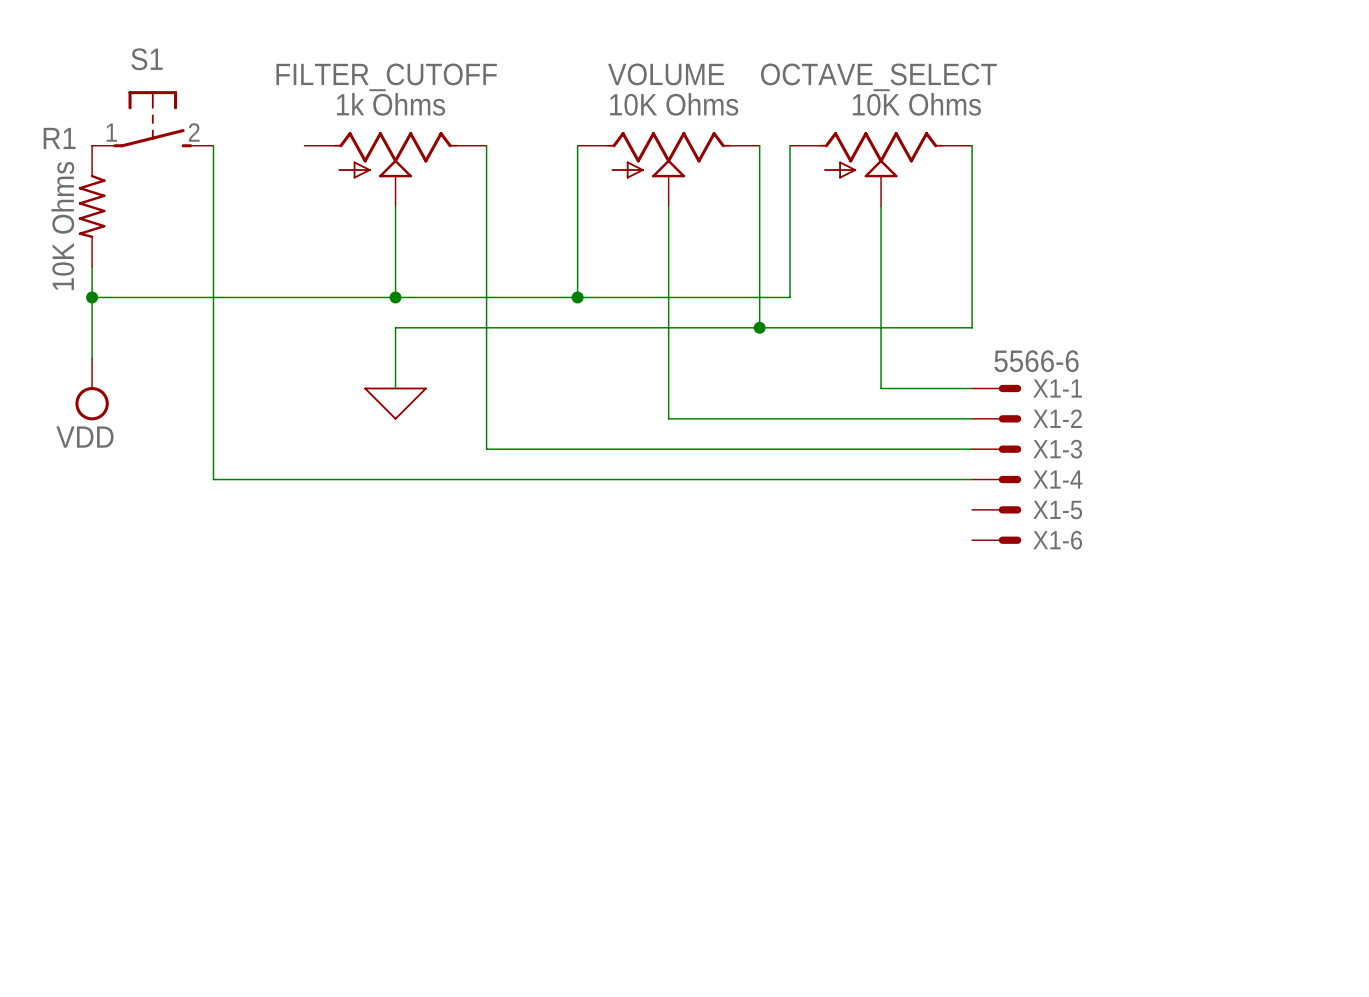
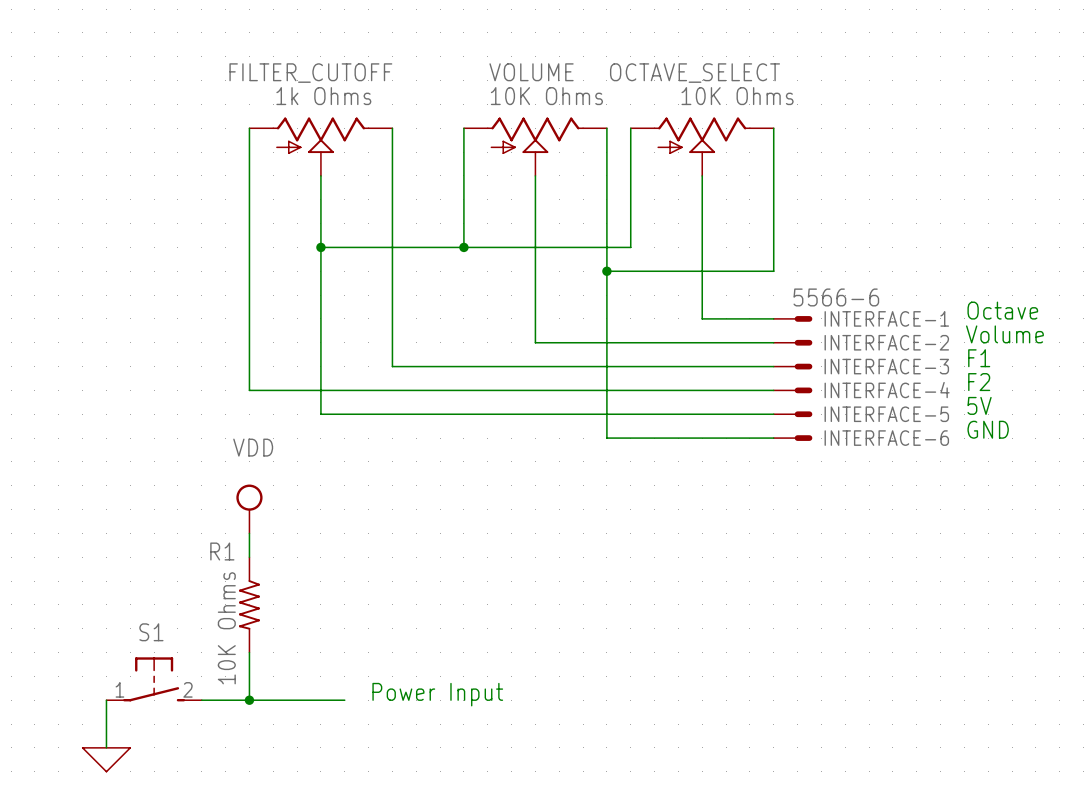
S1 position: (152, 119) -> (154, 679)
wire: (213, 145) (213, 479) (304, 479) -> (249, 128) (249, 390)
R1 position: (92, 206) -> (249, 604)
wire: (92, 267) (92, 358) -> none
wire: (92, 297) (395, 297) -> (320, 271) (320, 247)
junction: (92, 297) -> none
wire: (395, 327) (759, 327) -> (773, 438) (606, 438) (606, 271)
text: none -> Octave (1002, 310)
wire: none -> (320, 318) (320, 414) (773, 414)
X1-1 name: X1-1 (1057, 388) -> INTERFACE-1 (886, 318)
power symbol: VDD (92, 389) -> none
power symbol: (395, 403) -> none
text: none -> Volume (1004, 334)
X1-2 name: X1-2 (1057, 418) -> INTERFACE-2 (886, 342)
text: none -> F1 (979, 358)
X1-3 name: X1-3 (1057, 449) -> INTERFACE-3 (886, 366)
text: none -> F2 (979, 382)
X1-4 name: X1-4 (1057, 479) -> INTERFACE-4 (887, 390)
text: none -> 5V (979, 405)
X1-5 name: X1-5 (1057, 510) -> INTERFACE-5 (886, 414)
text: none -> GND (988, 429)
X1-6 name: X1-6 (1057, 540) -> INTERFACE-6 (886, 438)
power symbol: none -> VDD (249, 508)
wire: none -> (249, 533) (249, 557)
wire: none -> (249, 652) (249, 700)
text: none -> Power Input (437, 694)
wire: none -> (106, 700) (106, 747)
wire: none -> (201, 700) (344, 700)
junction: none -> (249, 700)
power symbol: none -> (106, 759)

